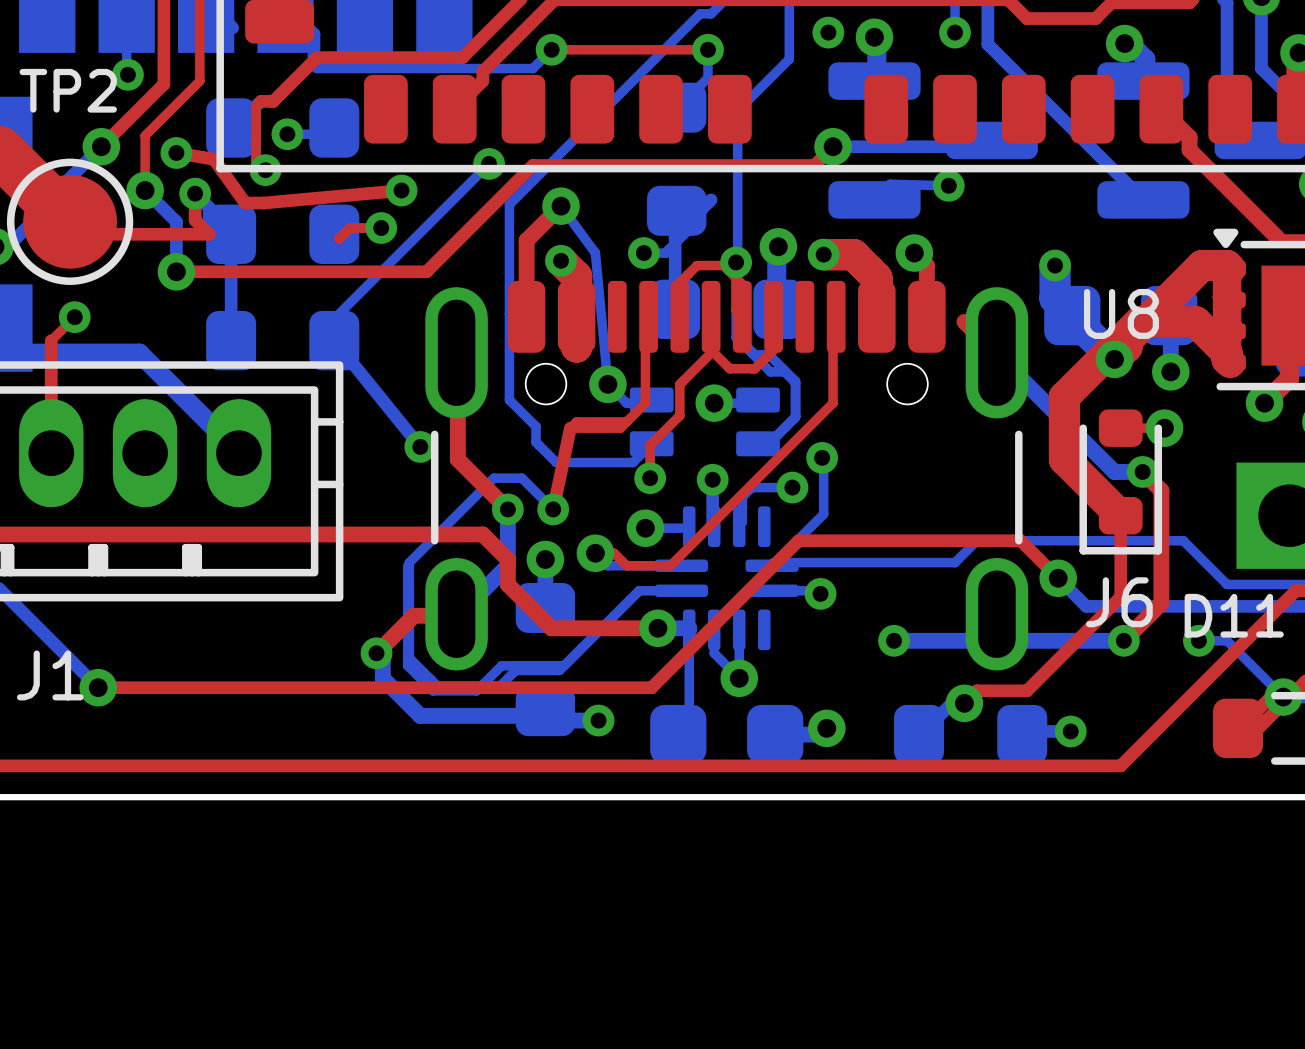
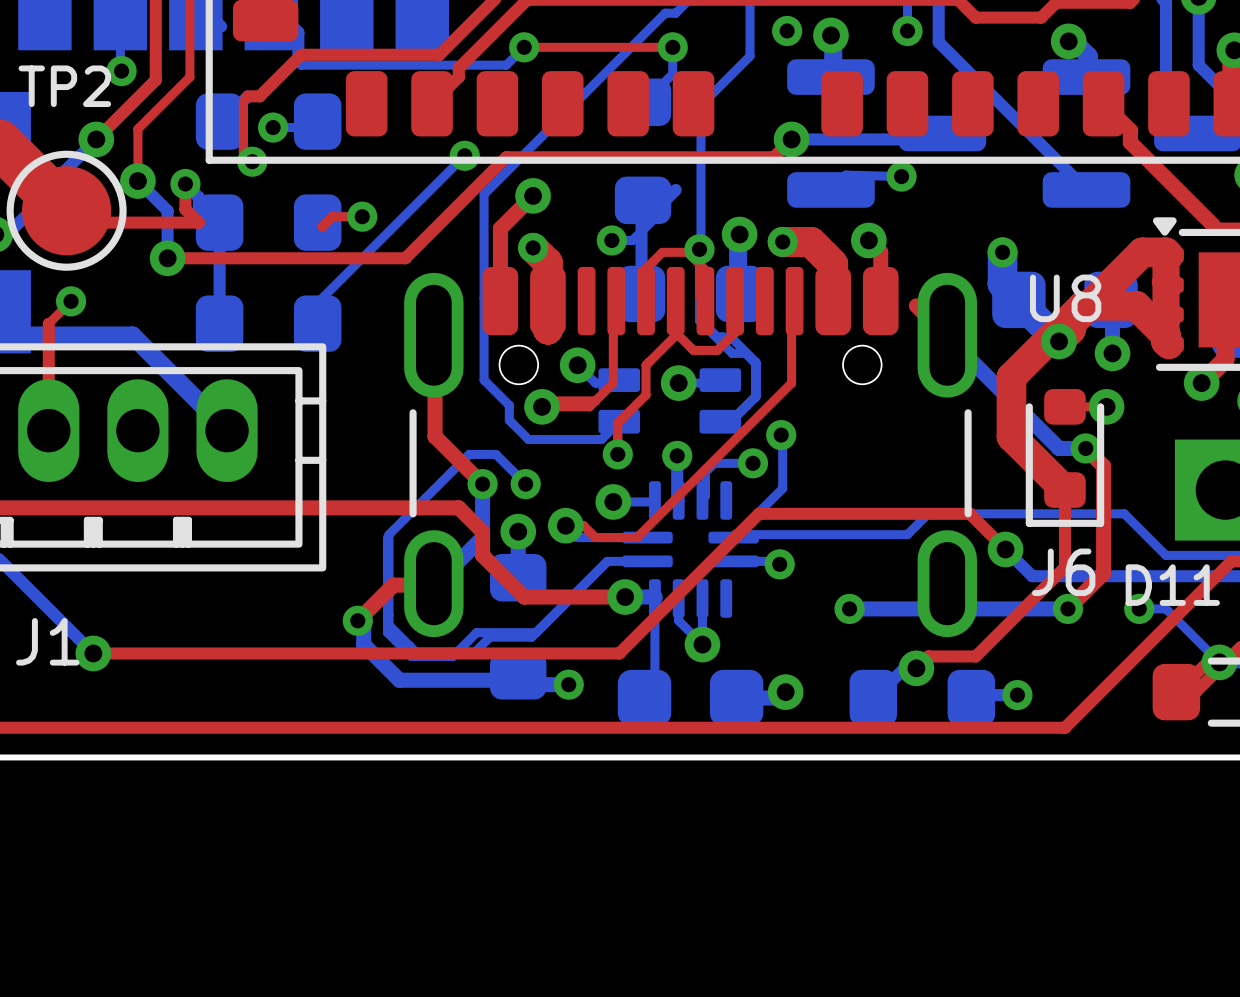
top track: (176, 152) (213, 159) (245, 203) (401, 190) -> none
via: (176, 152) -> none
via: (401, 190) -> none
bottom track: (561, 206) (595, 253) (607, 384) -> none
bottom track: (334, 340) (420, 446) -> none
top track: (570, 428) (553, 509) -> none
via: none -> (542, 406)
via: (420, 446) -> none

